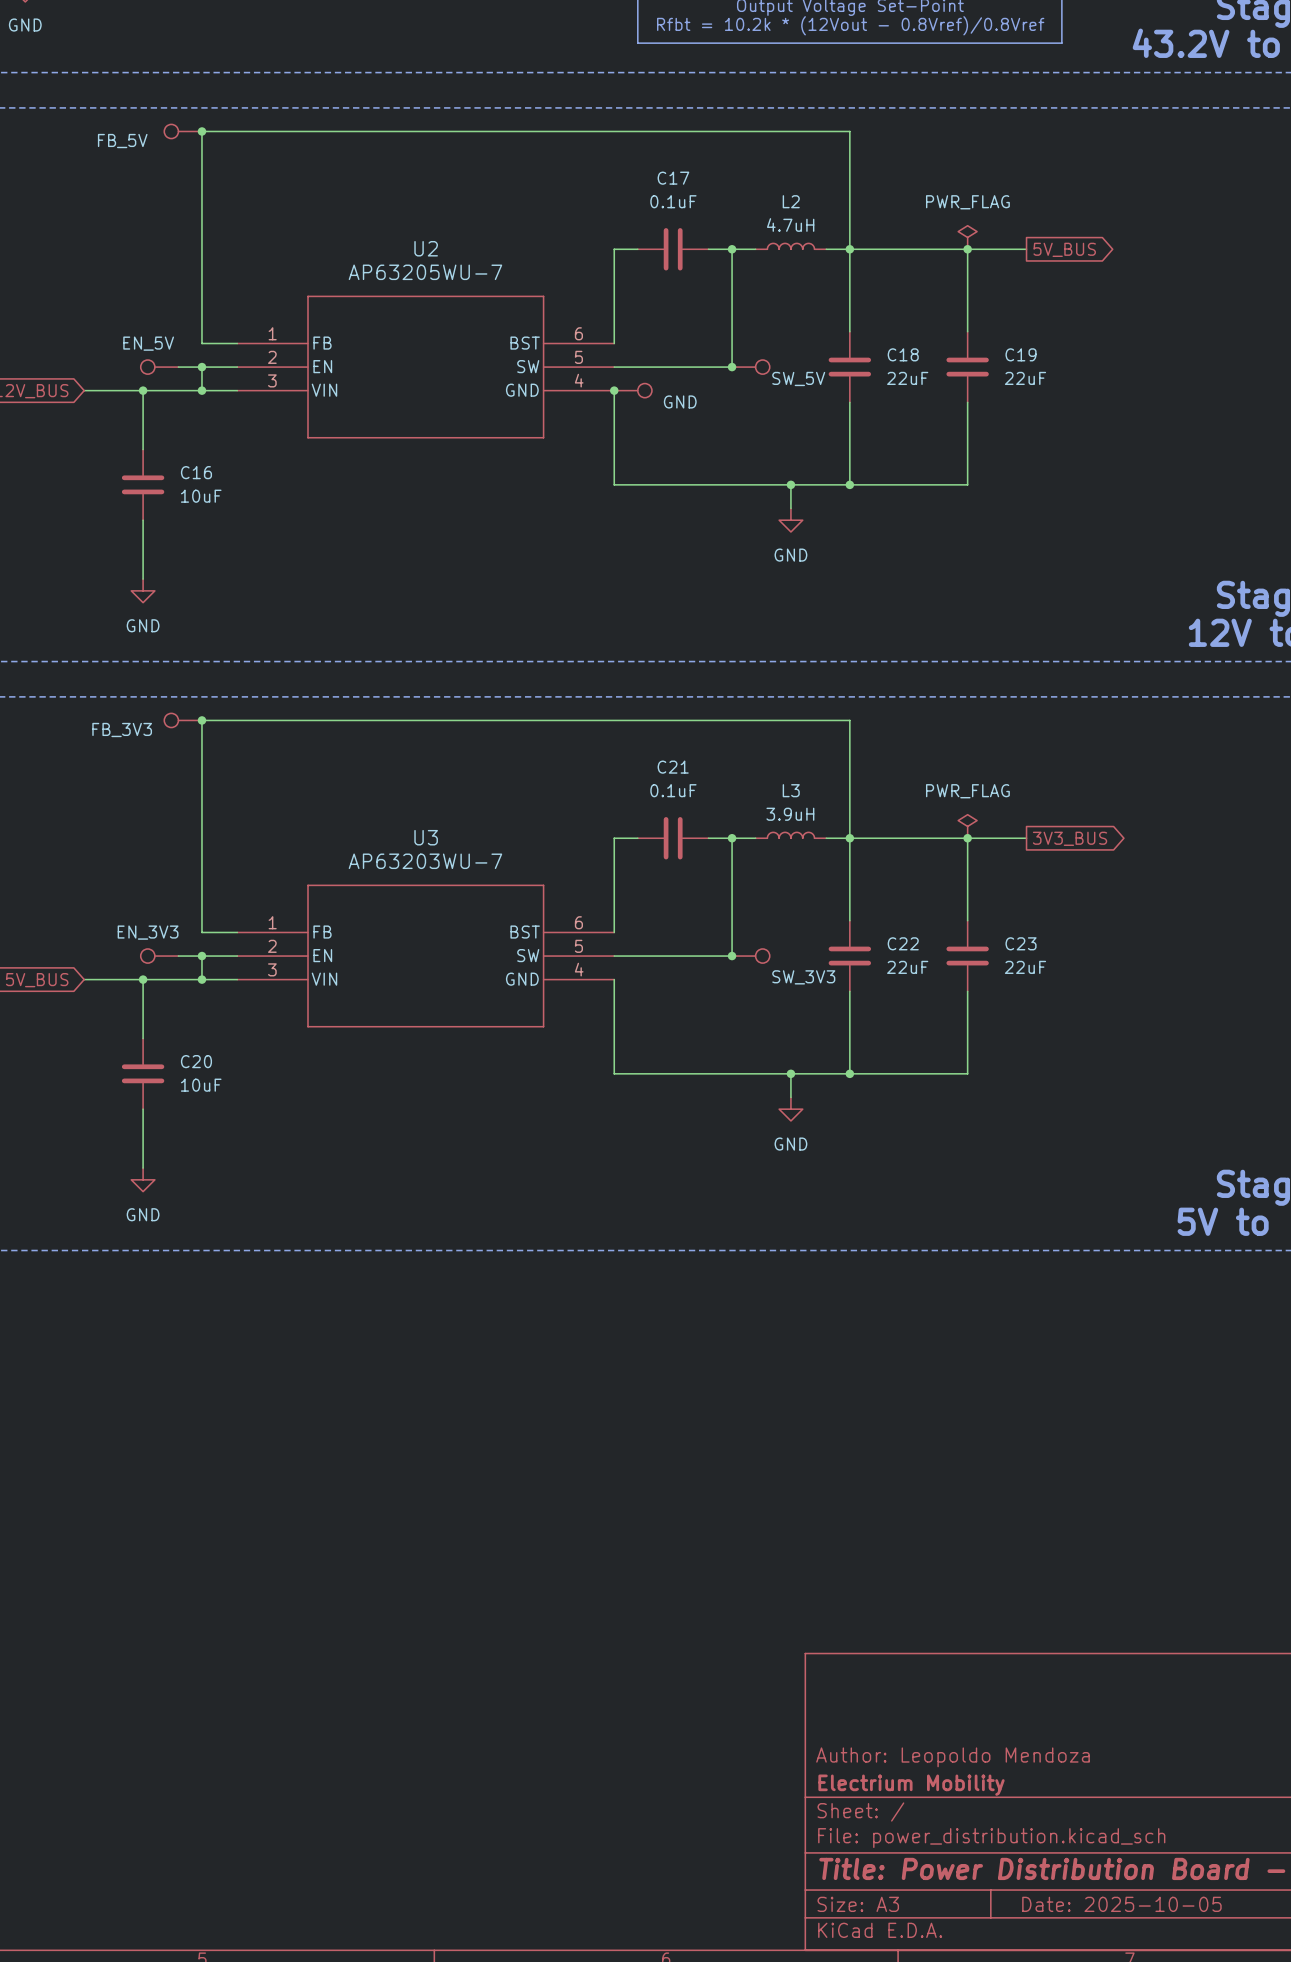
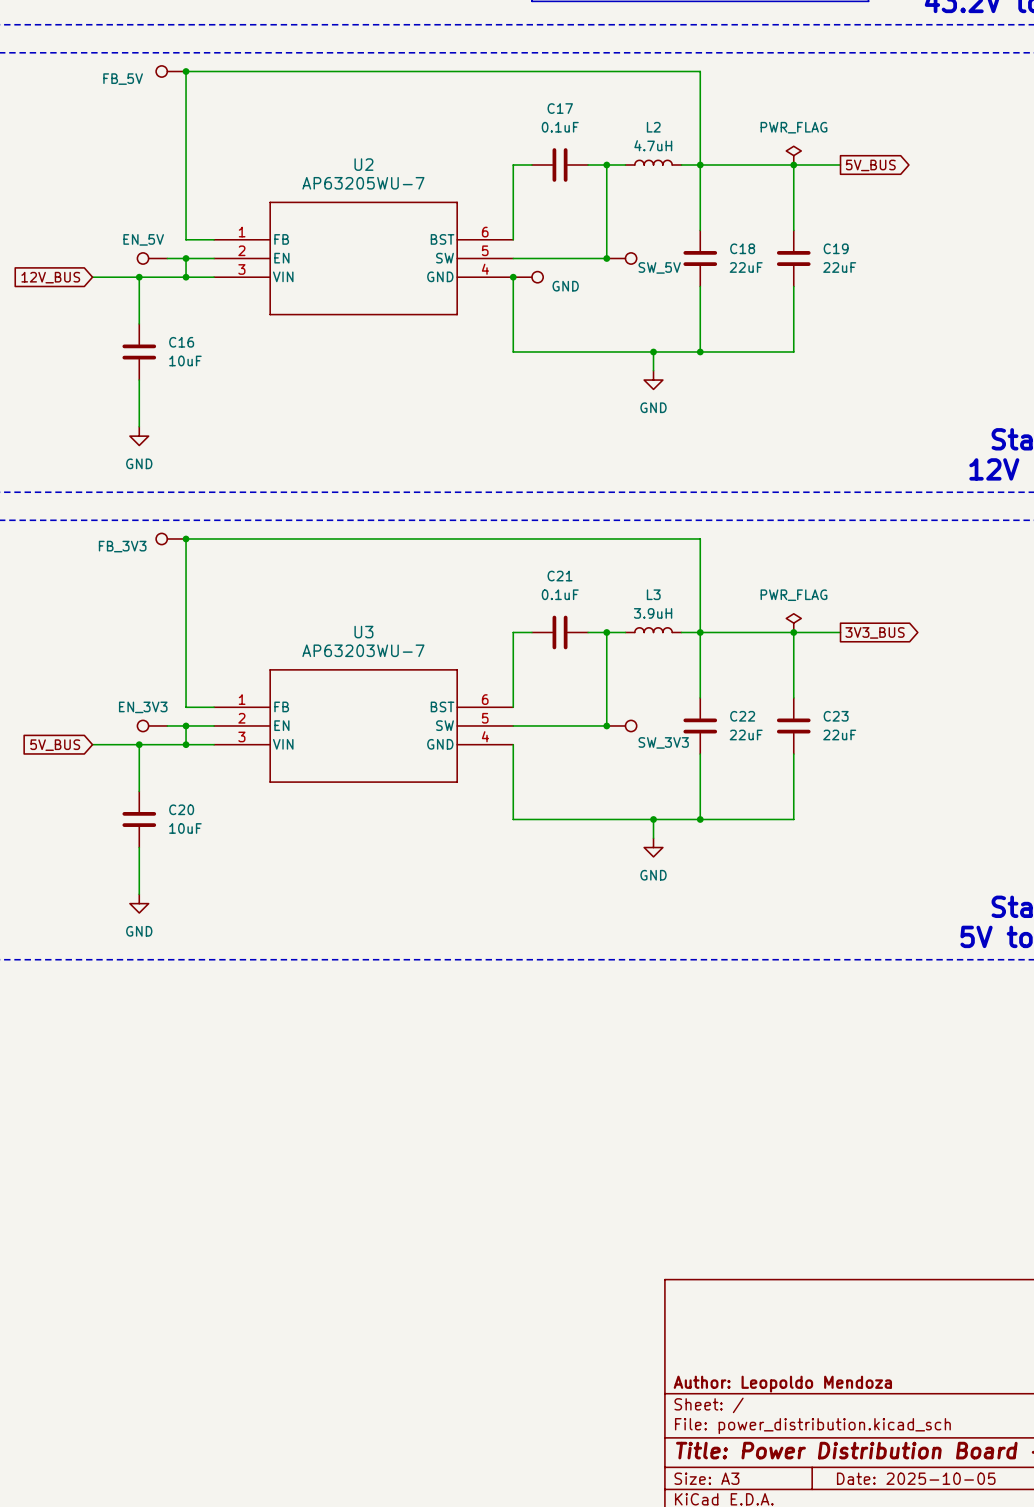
title block: Author: Leopoldo Mendoza (953, 1757) -> none
title block: Electrium Mobility (911, 1785) -> Author: Leopoldo Mendoza (782, 1384)

